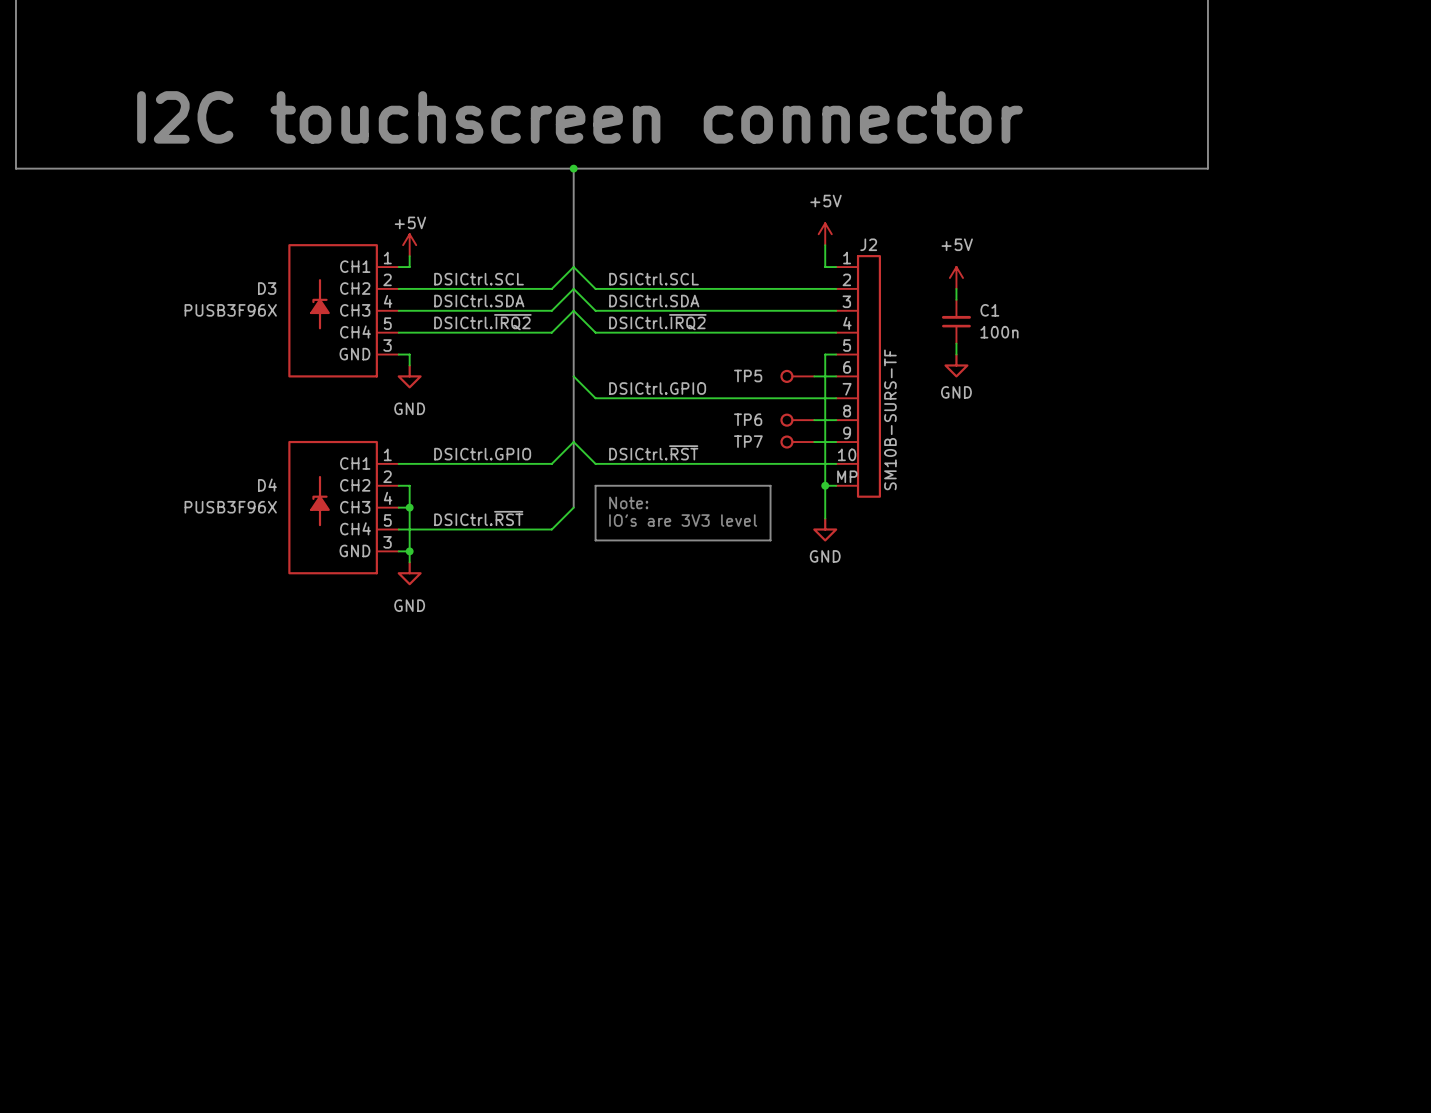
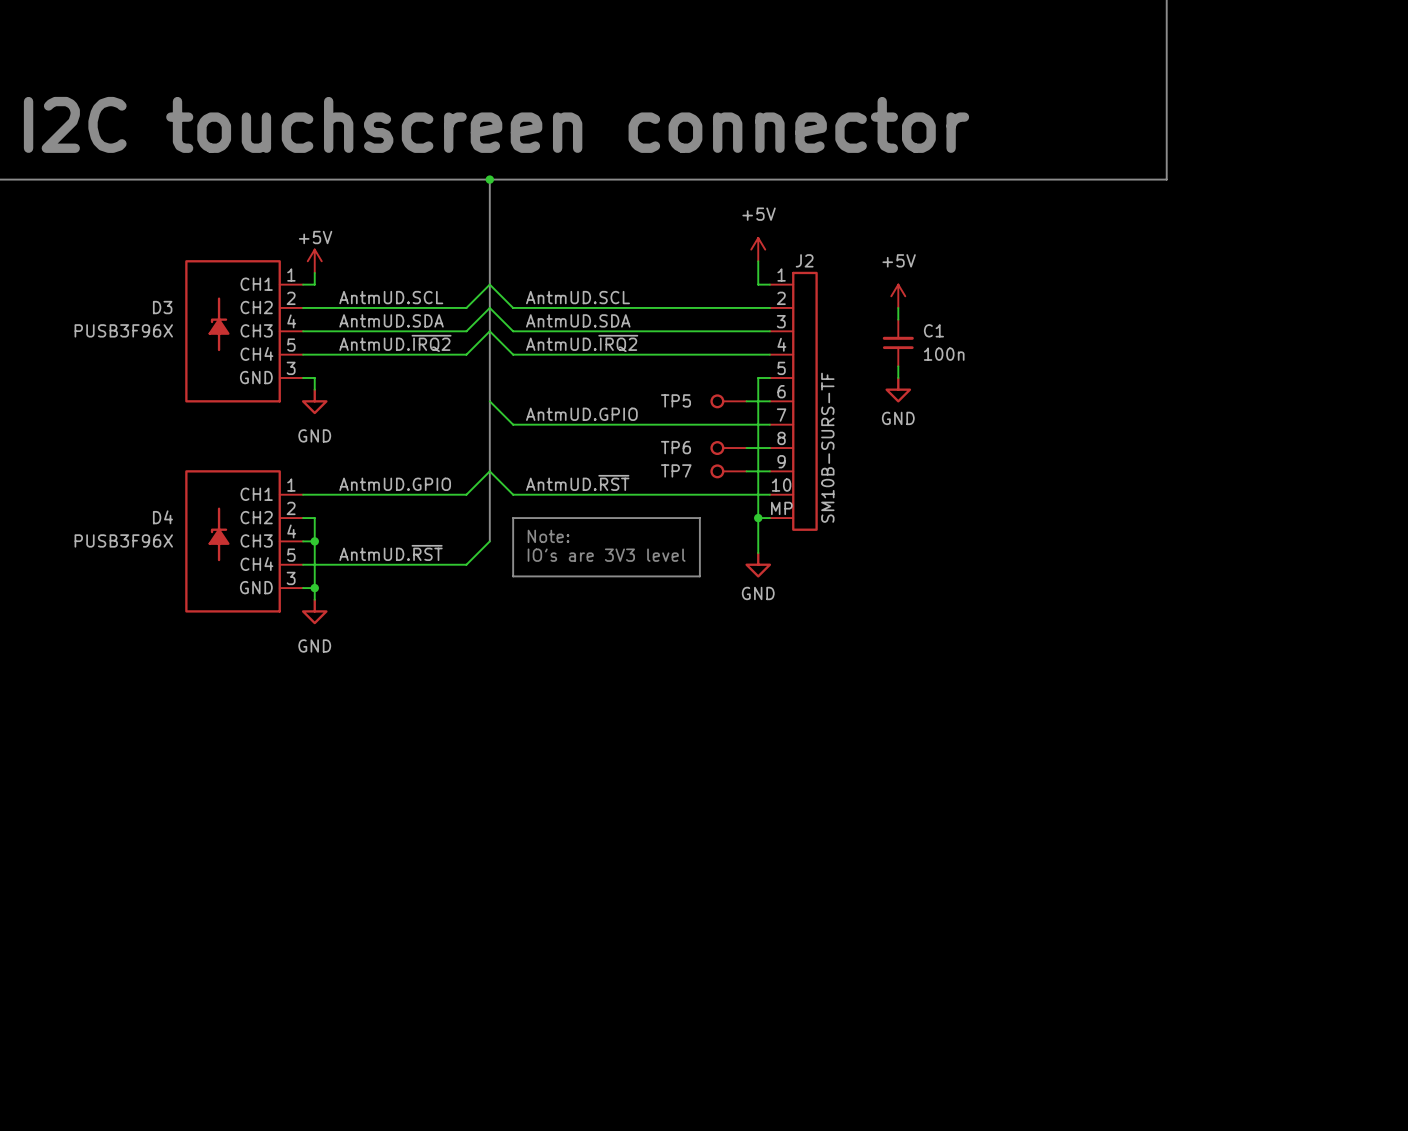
label: DSICtrl.SCL (479, 279) -> AntmUD.SCL (391, 297)
label: DSICtrl.SCL (653, 279) -> AntmUD.SCL (577, 297)
label: DSICtrl.SDA (479, 301) -> AntmUD.SDA (391, 320)
label: DSICtrl.SDA (654, 301) -> AntmUD.SDA (578, 320)
label: DSICtrl.~{IRQ2} (482, 322) -> AntmUD.~{IRQ2} (395, 343)
label: DSICtrl.~{IRQ2} (657, 322) -> AntmUD.~{IRQ2} (582, 343)
label: DSICtrl.GPIO (657, 388) -> AntmUD.GPIO (581, 414)
label: DSICtrl.~{RST} (653, 452) -> AntmUD.~{RST} (577, 482)
label: DSICtrl.GPIO (482, 454) -> AntmUD.GPIO (395, 484)
label: DSICtrl.~{RST} (478, 518) -> AntmUD.~{RST} (390, 552)

